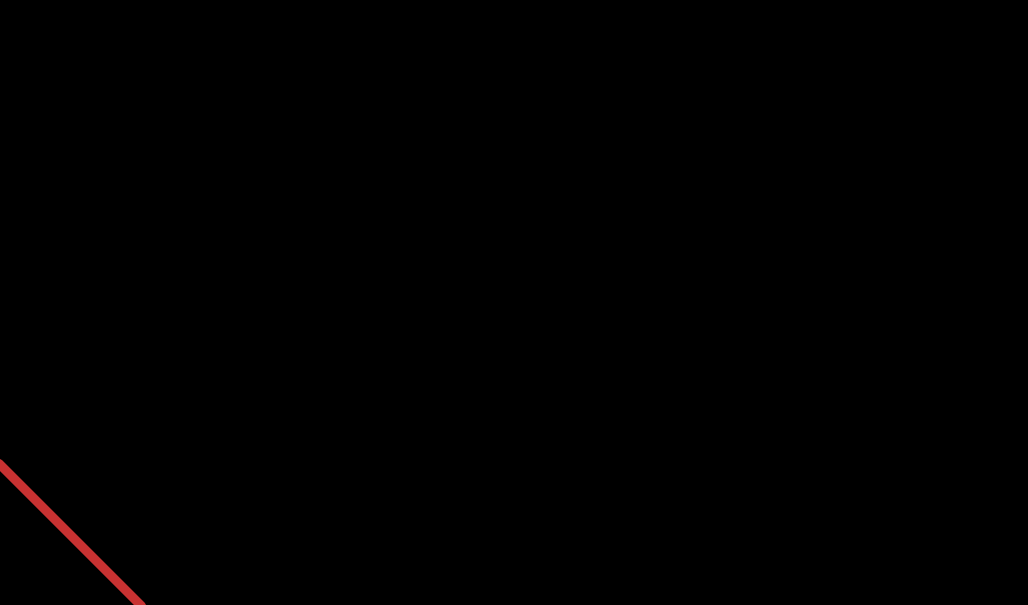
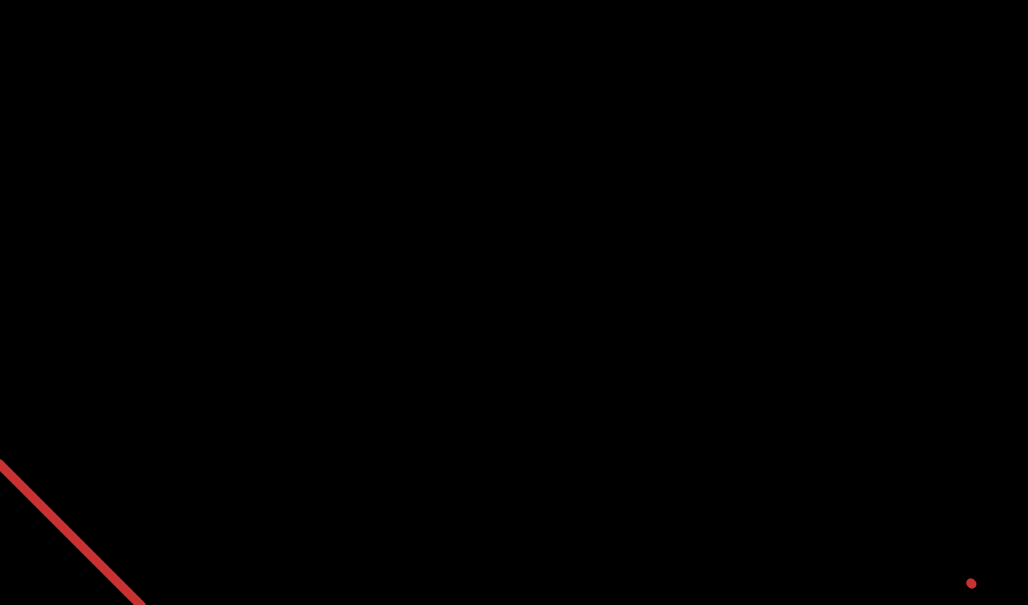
top track: none -> (970, 582) (971, 584)

